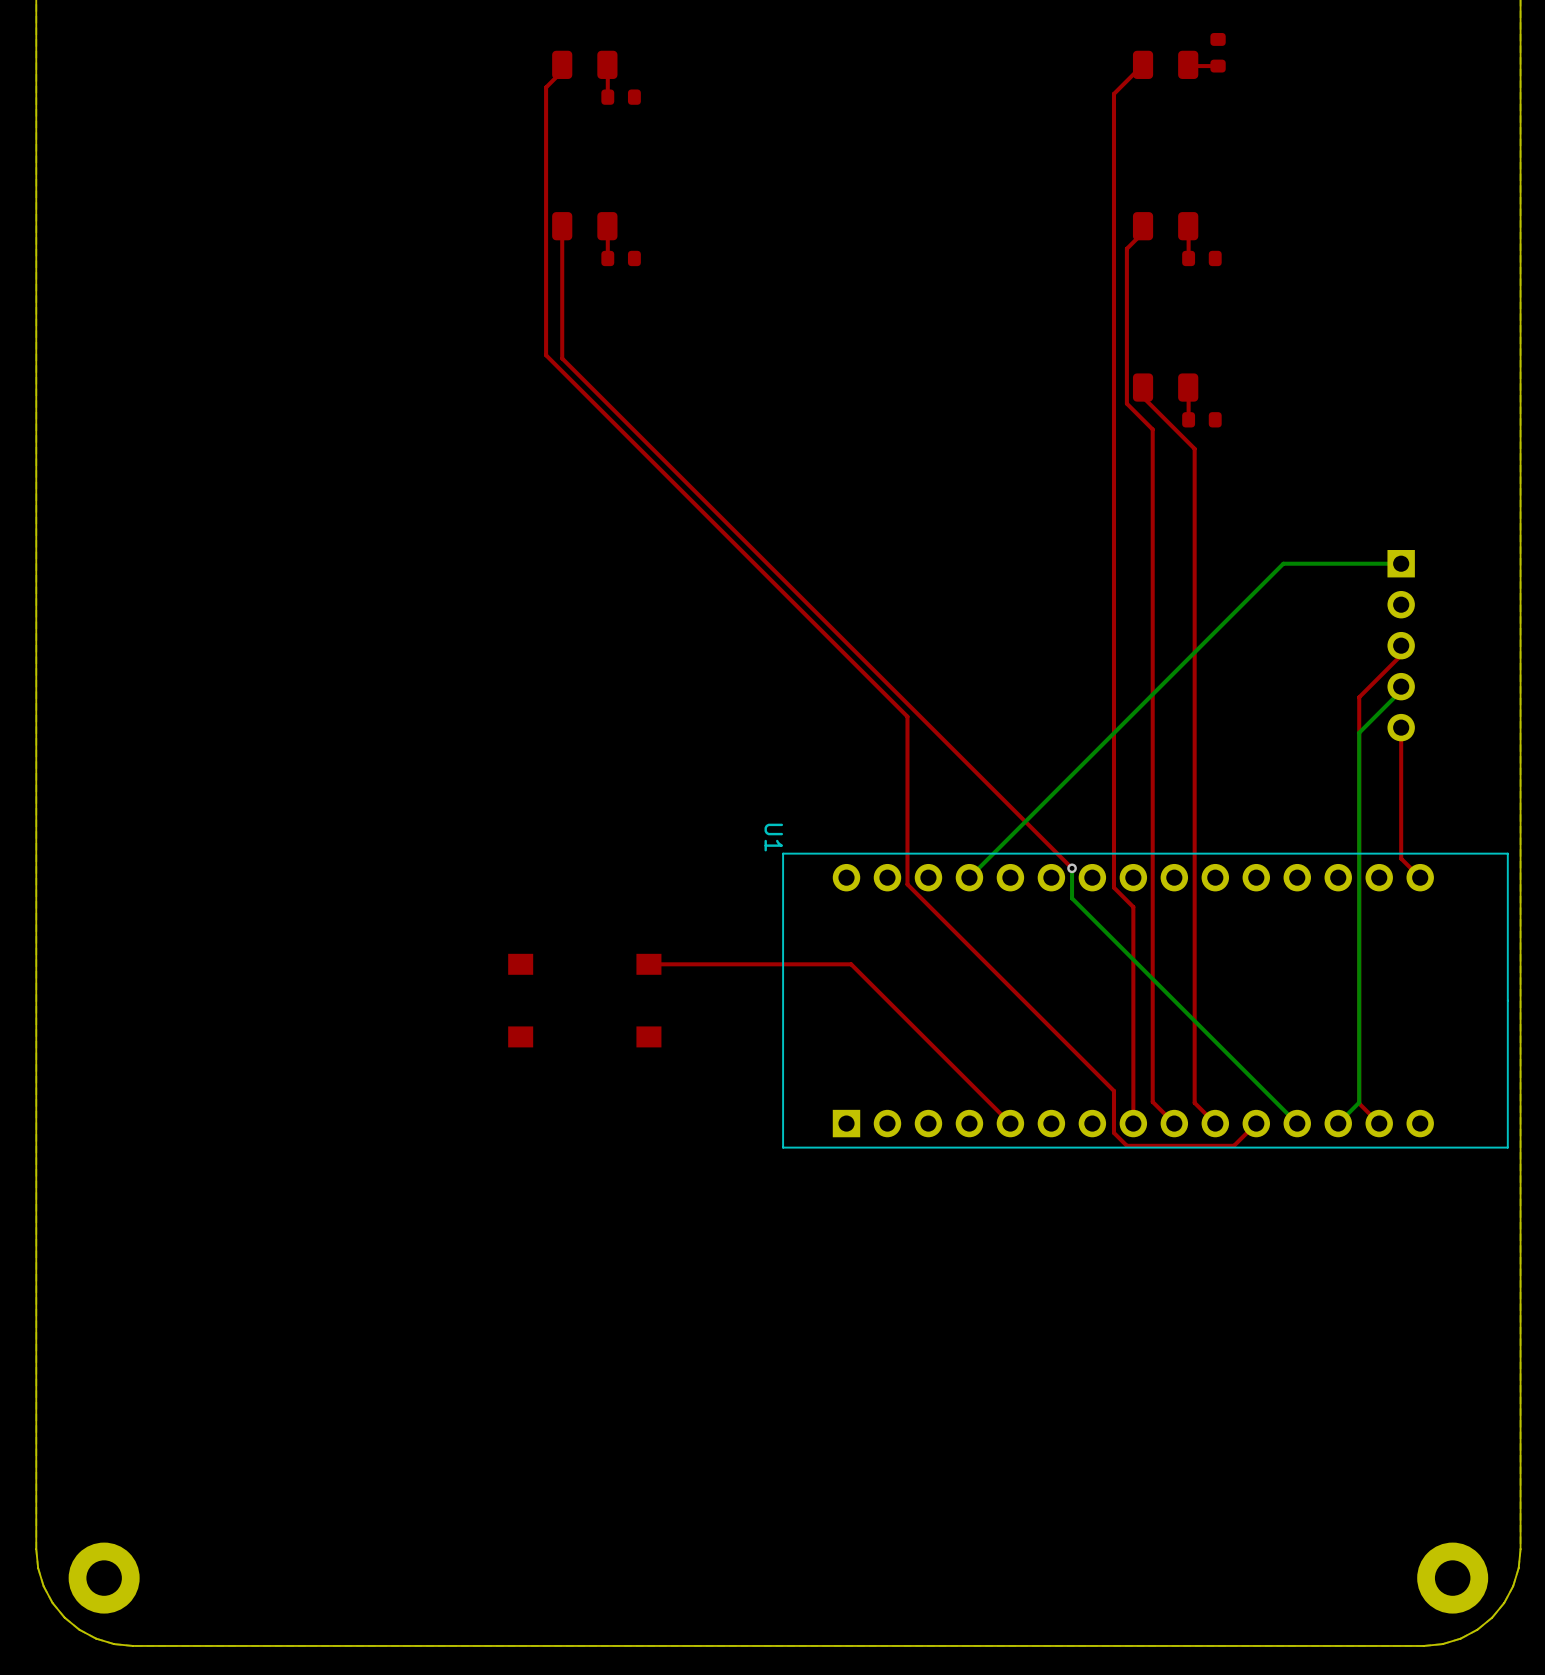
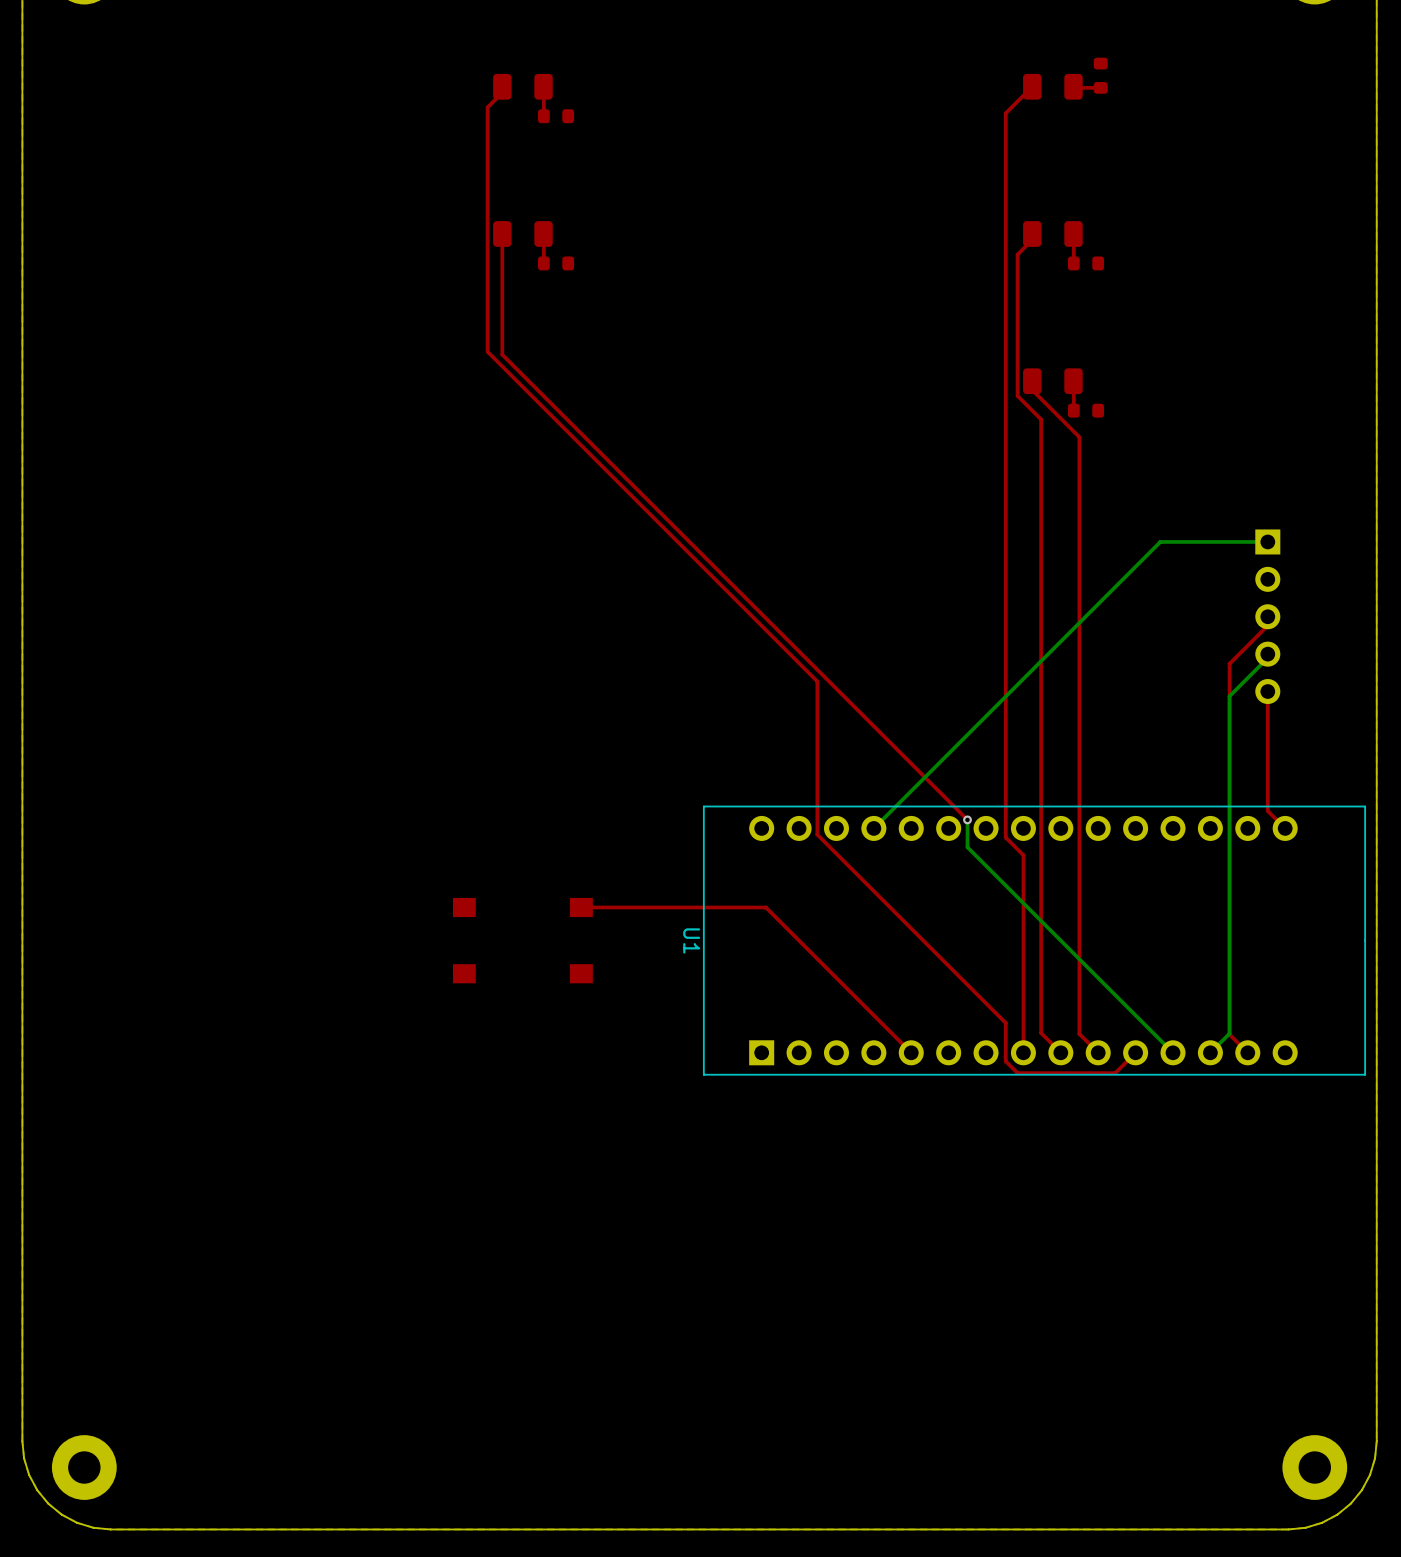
U1 name position: U1 (773, 837) -> U1 (691, 940)

